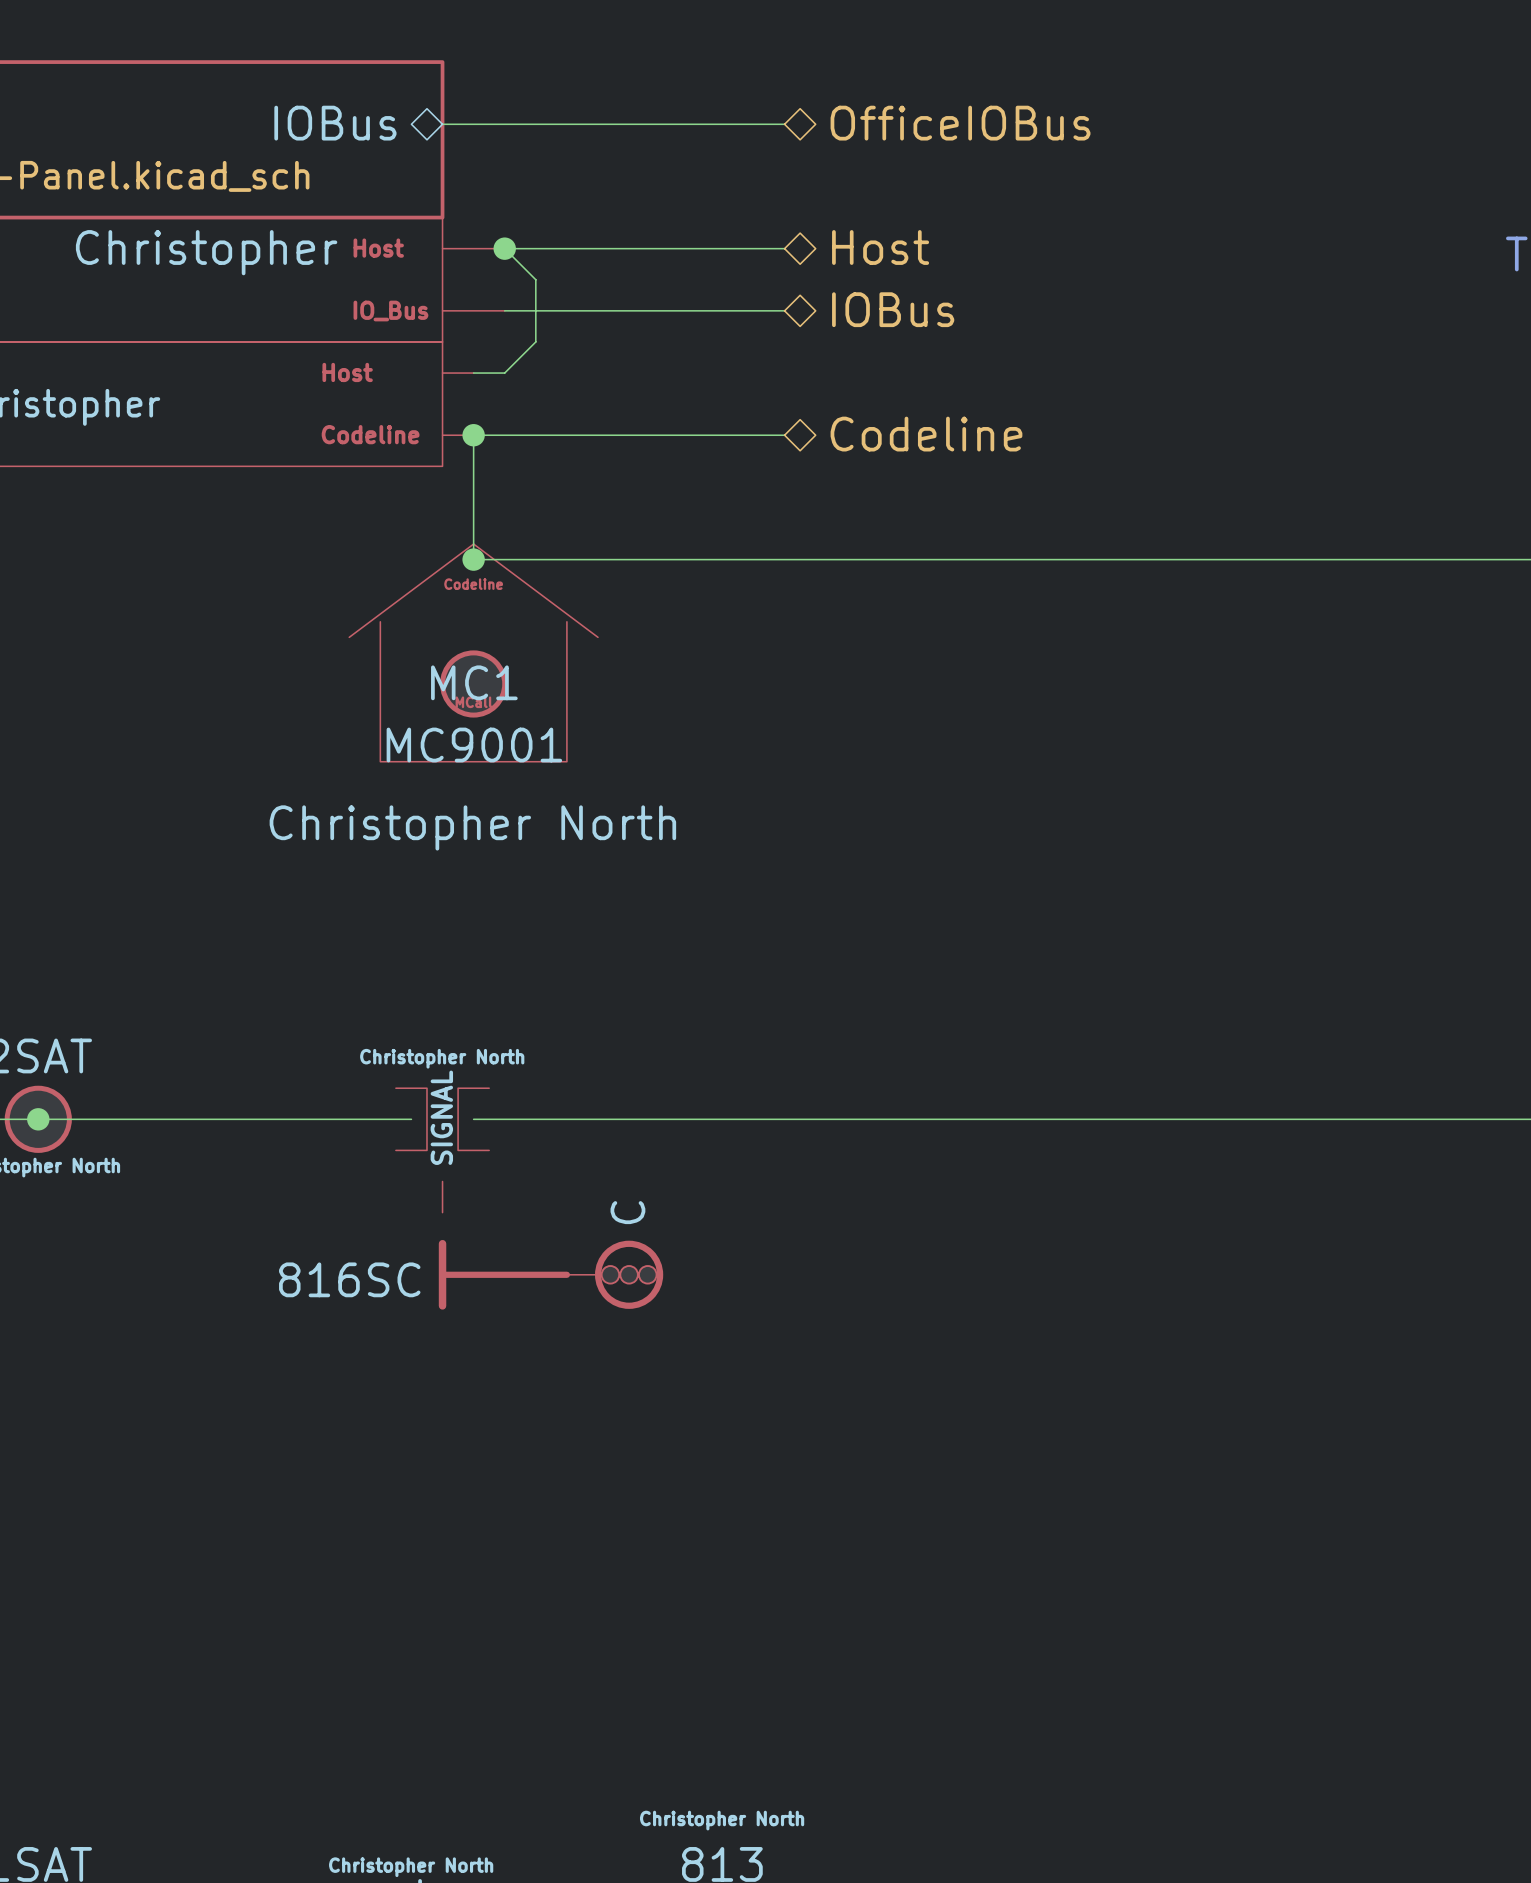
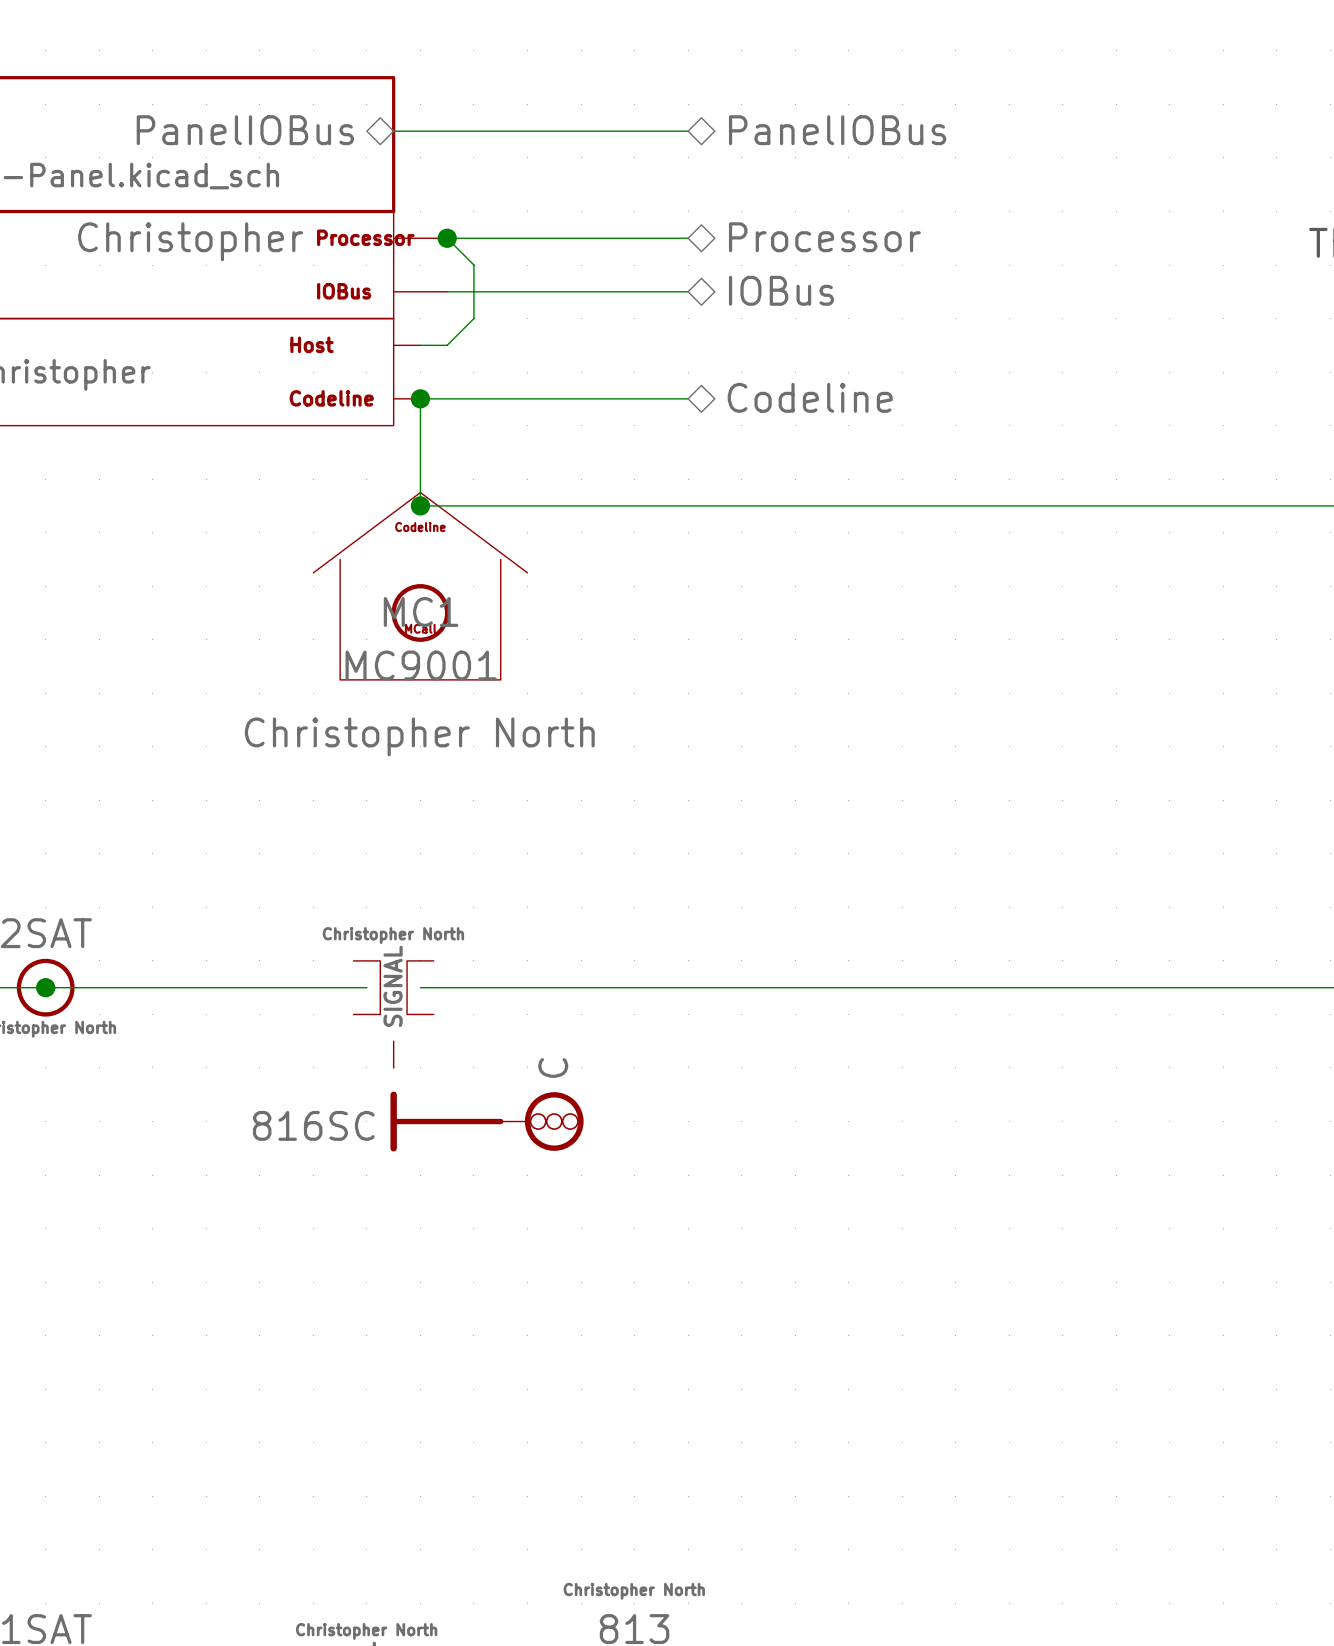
sheet pin: IOBus (335, 123) -> PanelIOBus (245, 130)
hierarchical label: OfficeIOBus (960, 123) -> PanelIOBus (837, 130)
hierarchical label: Host (880, 247) -> Processor (824, 237)
part text: Host (378, 248) -> Processor (365, 237)
part text: IO_Bus (390, 311) -> IOBus (344, 291)

